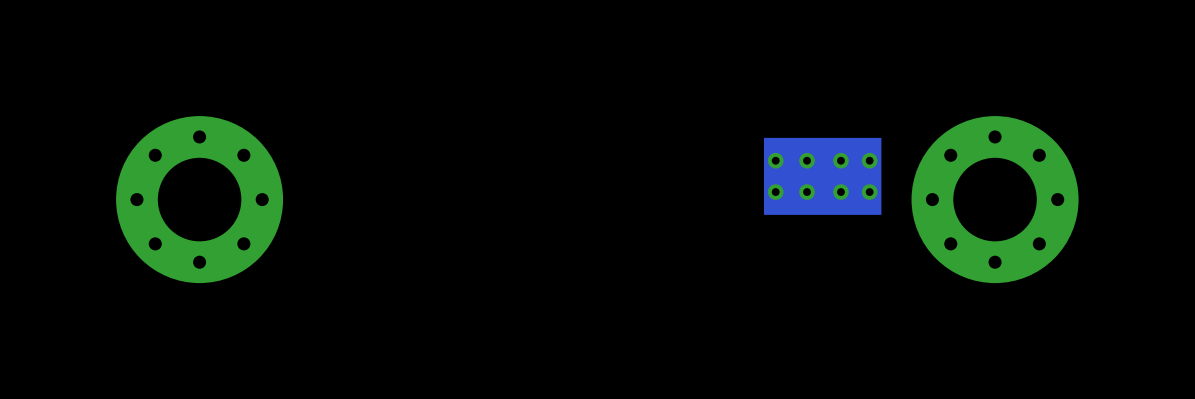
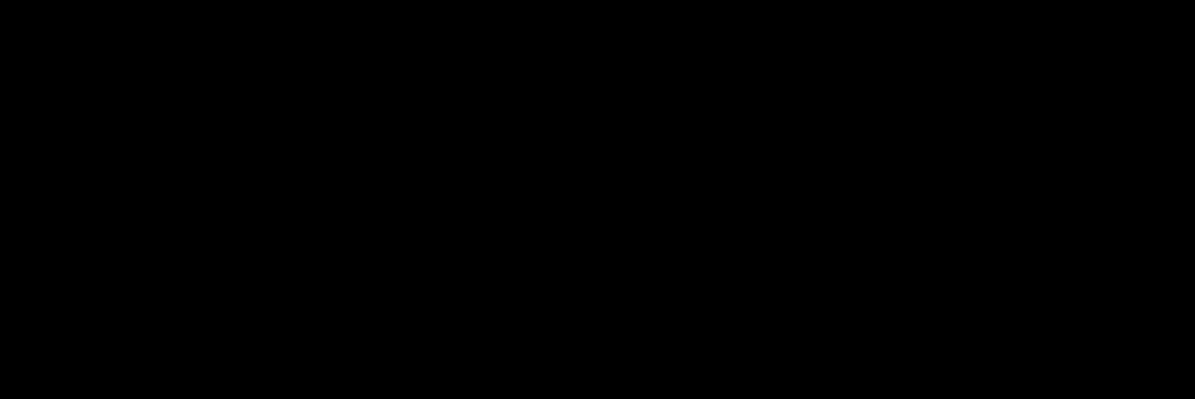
part: (822, 176) -> none
part: (199, 199) -> none
part: (995, 199) -> none

